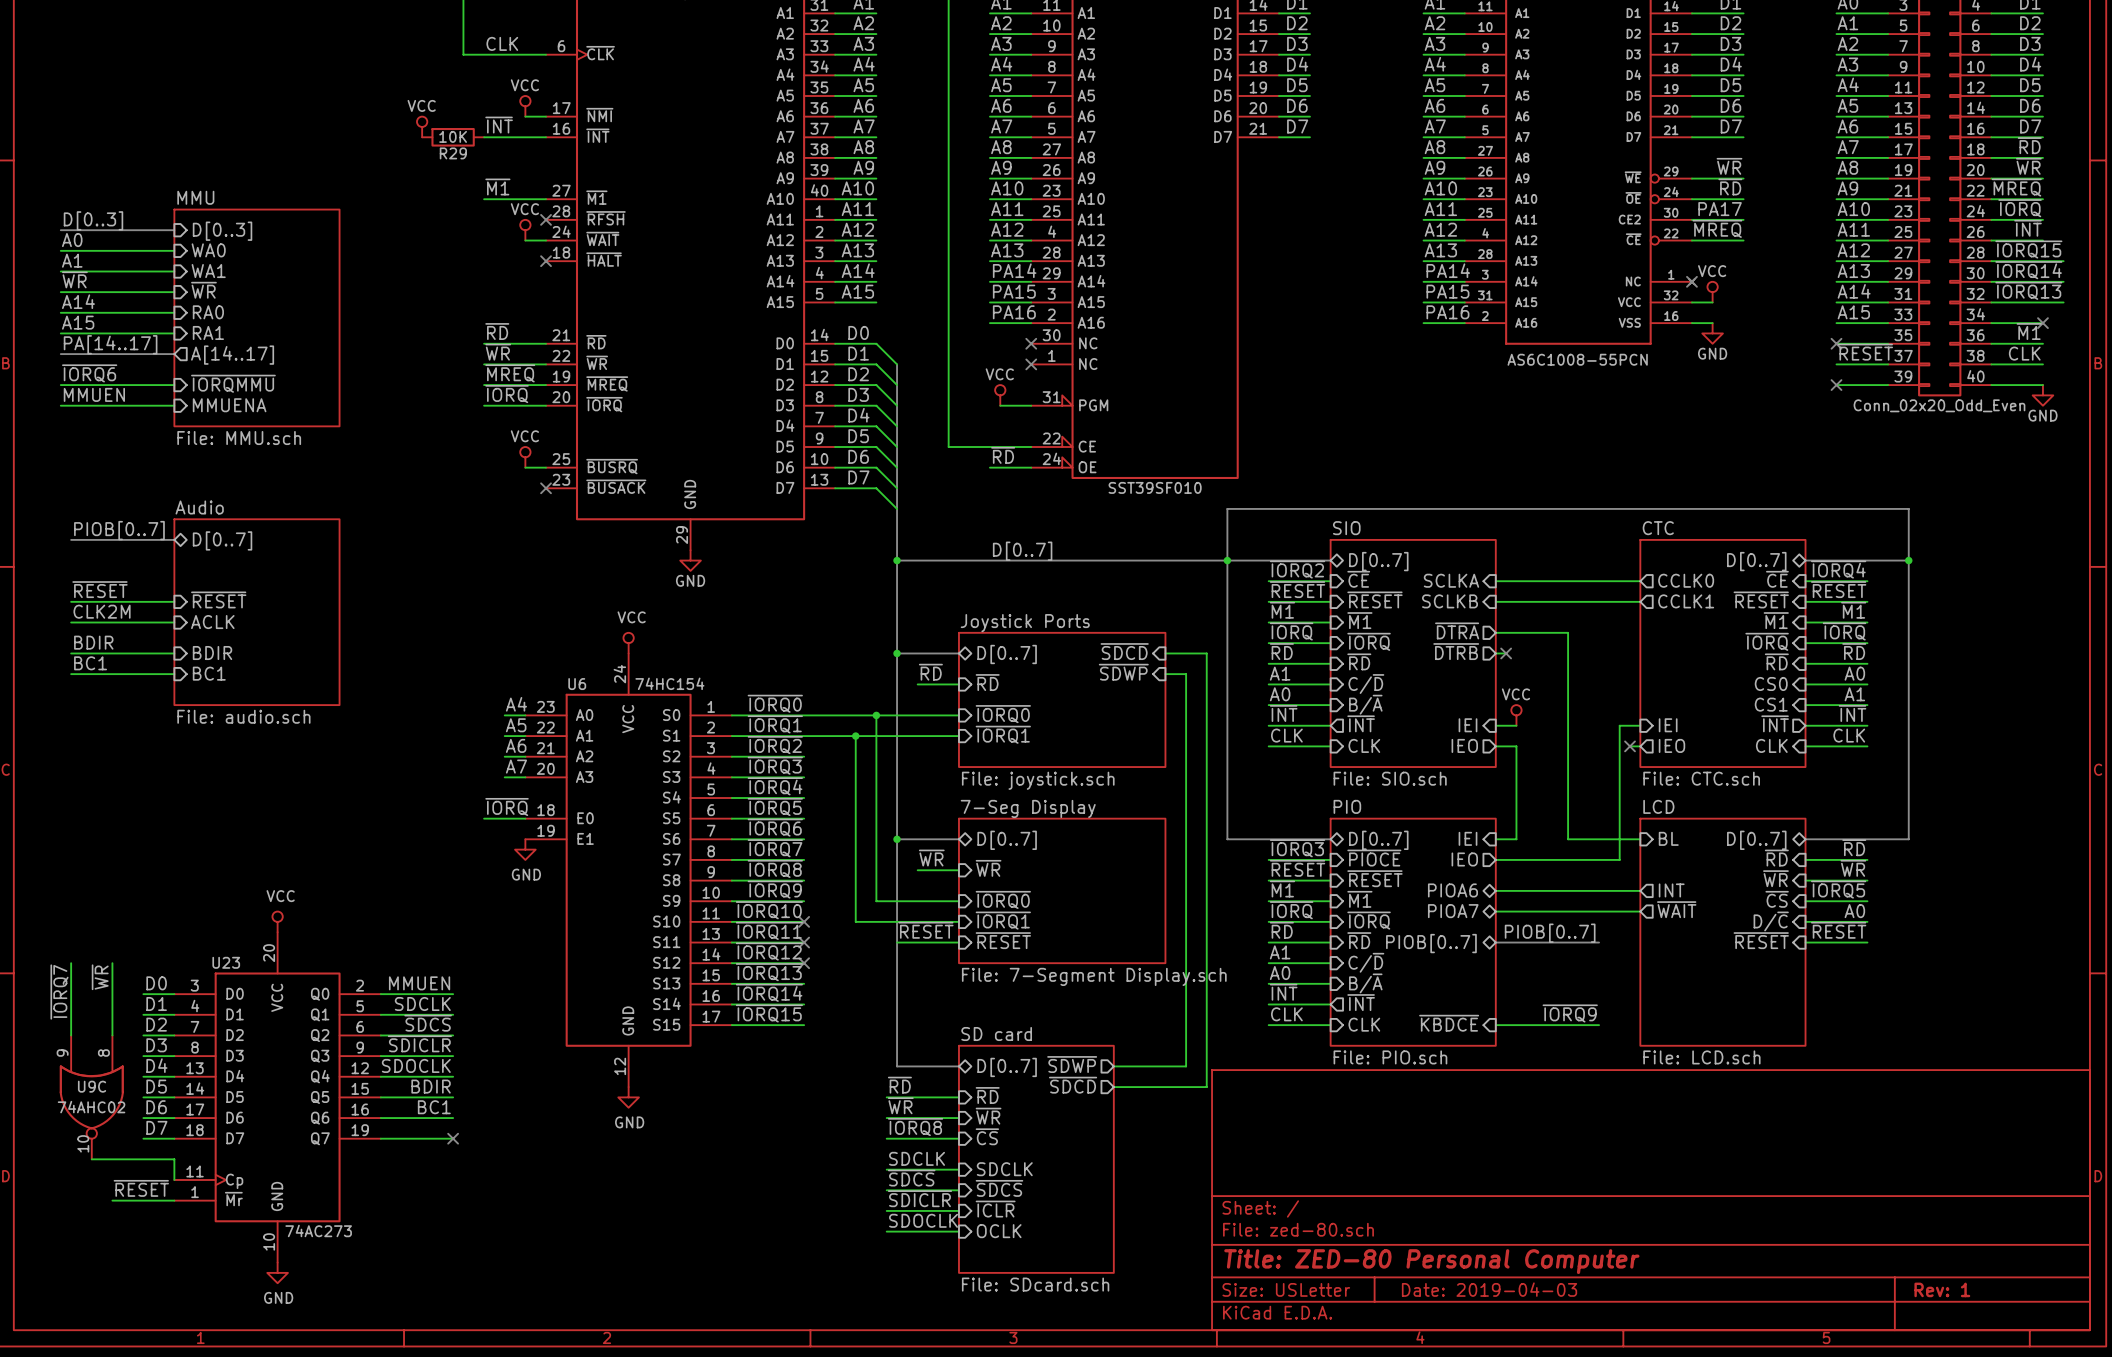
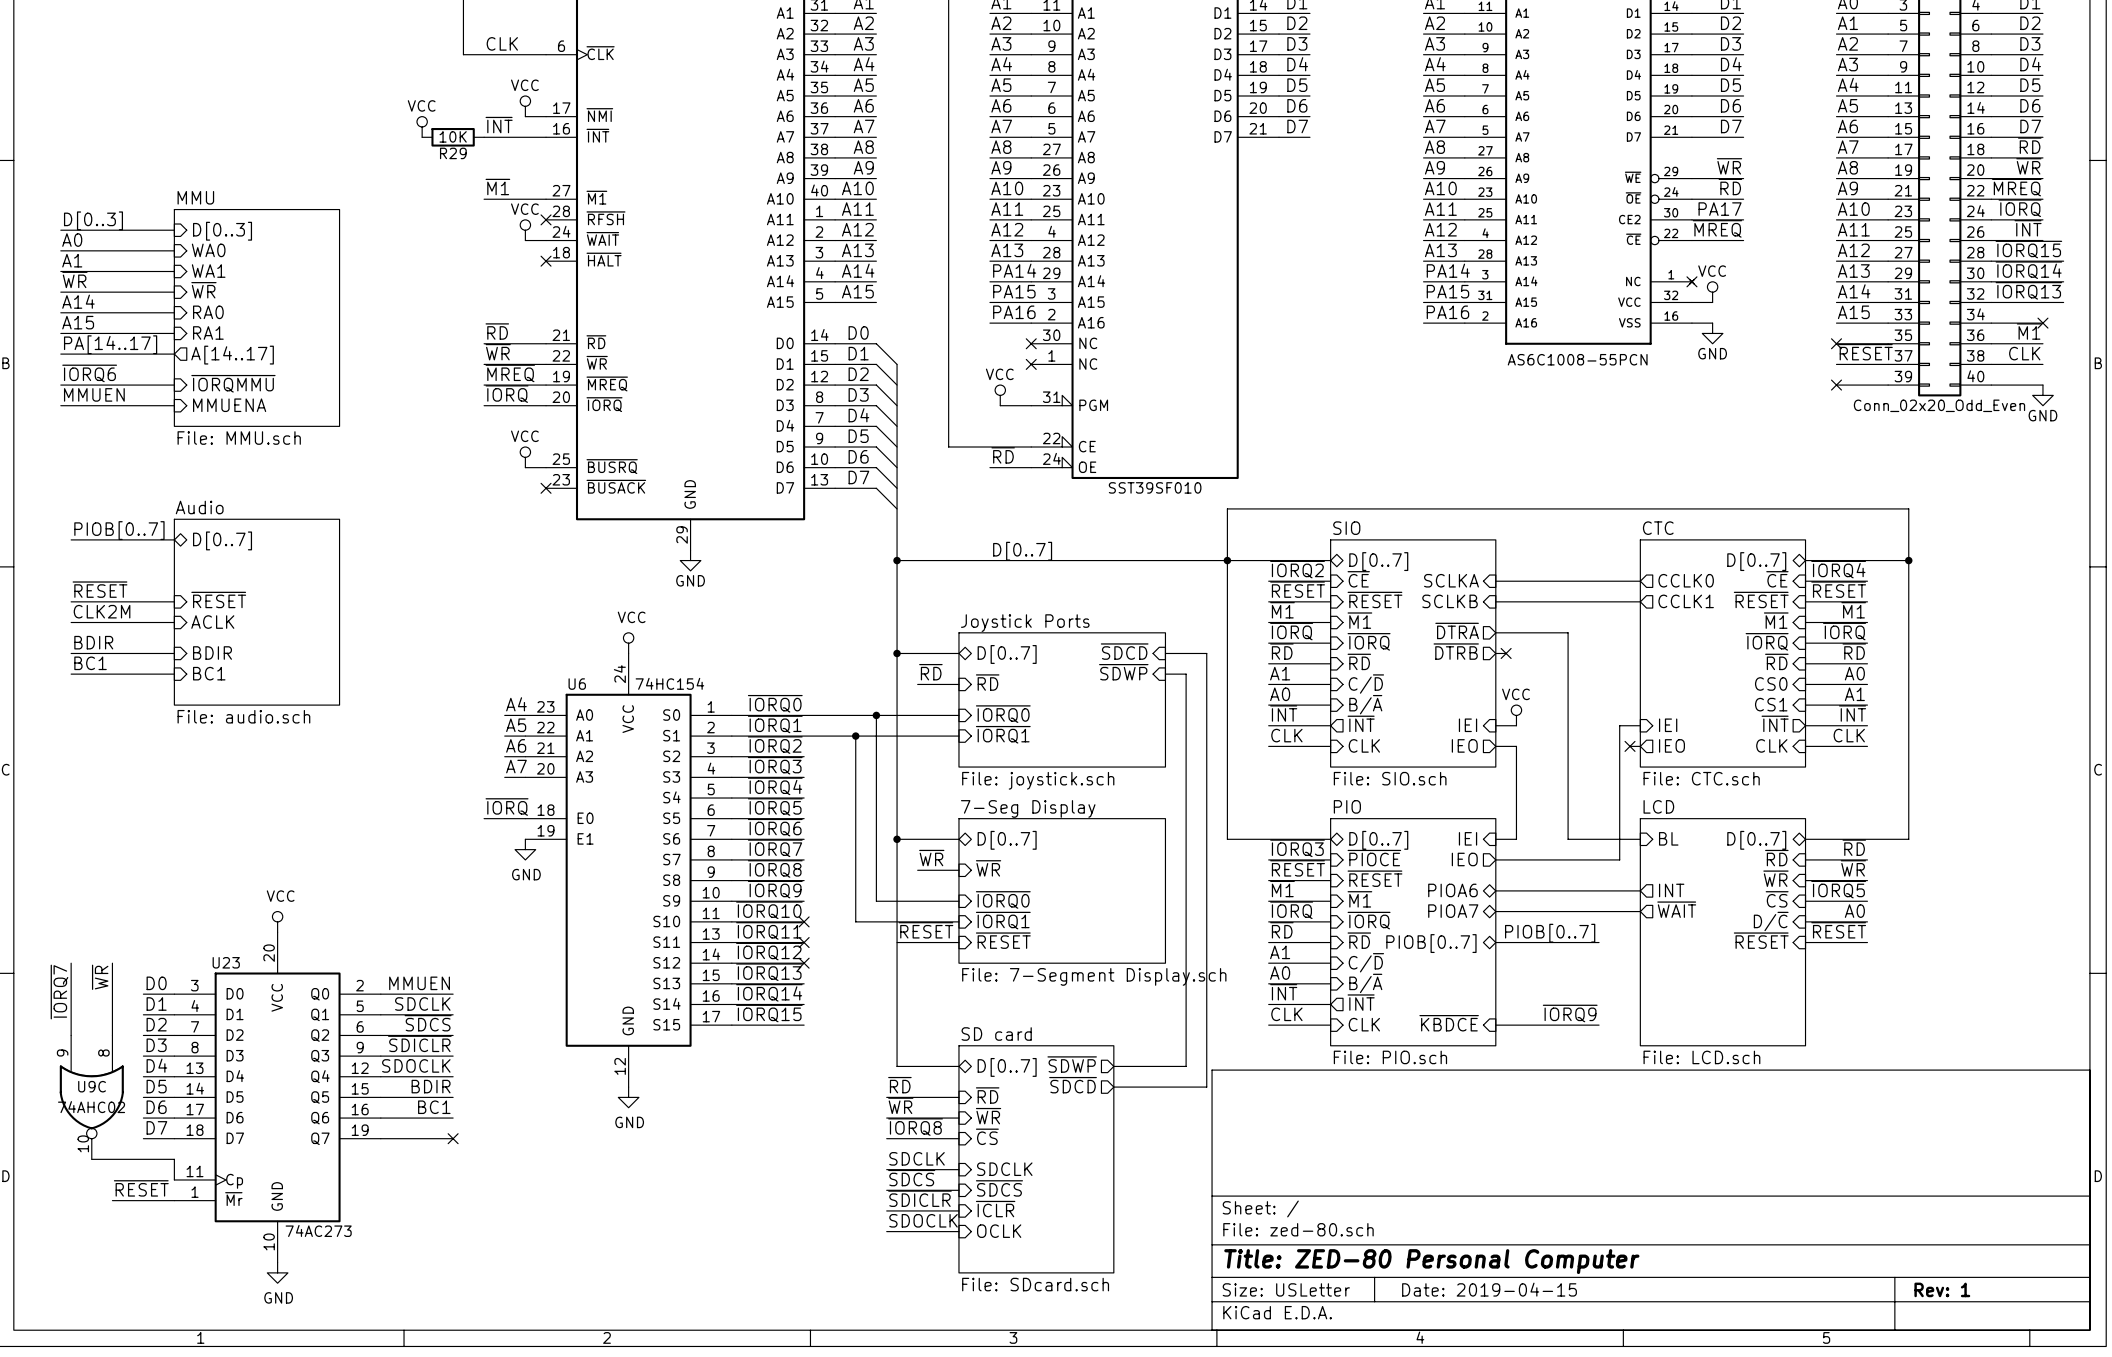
title block: Date: 2019-04-03 (1489, 1289) -> Date: 2019-04-15 (1489, 1289)

